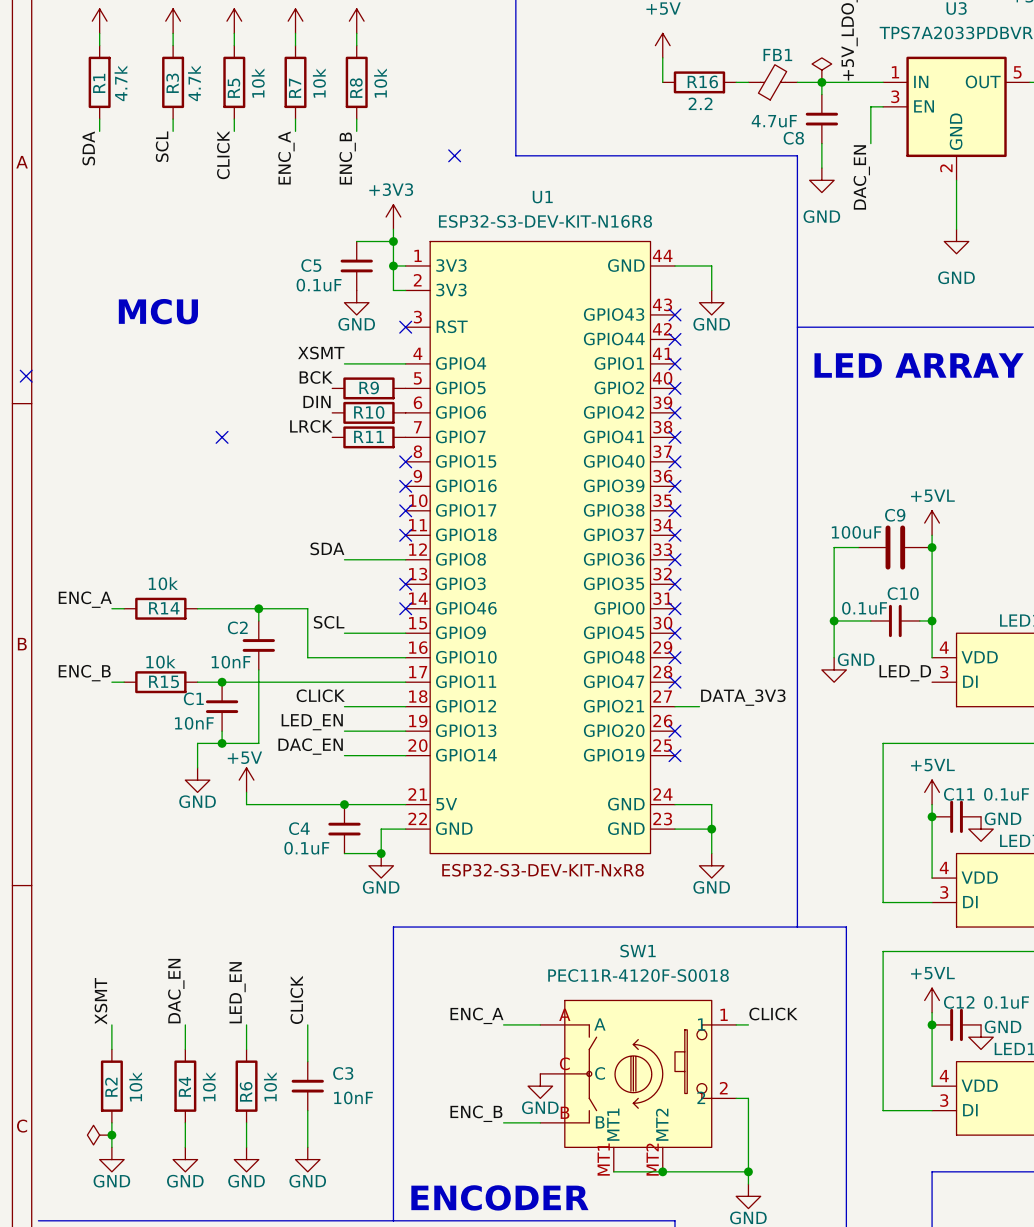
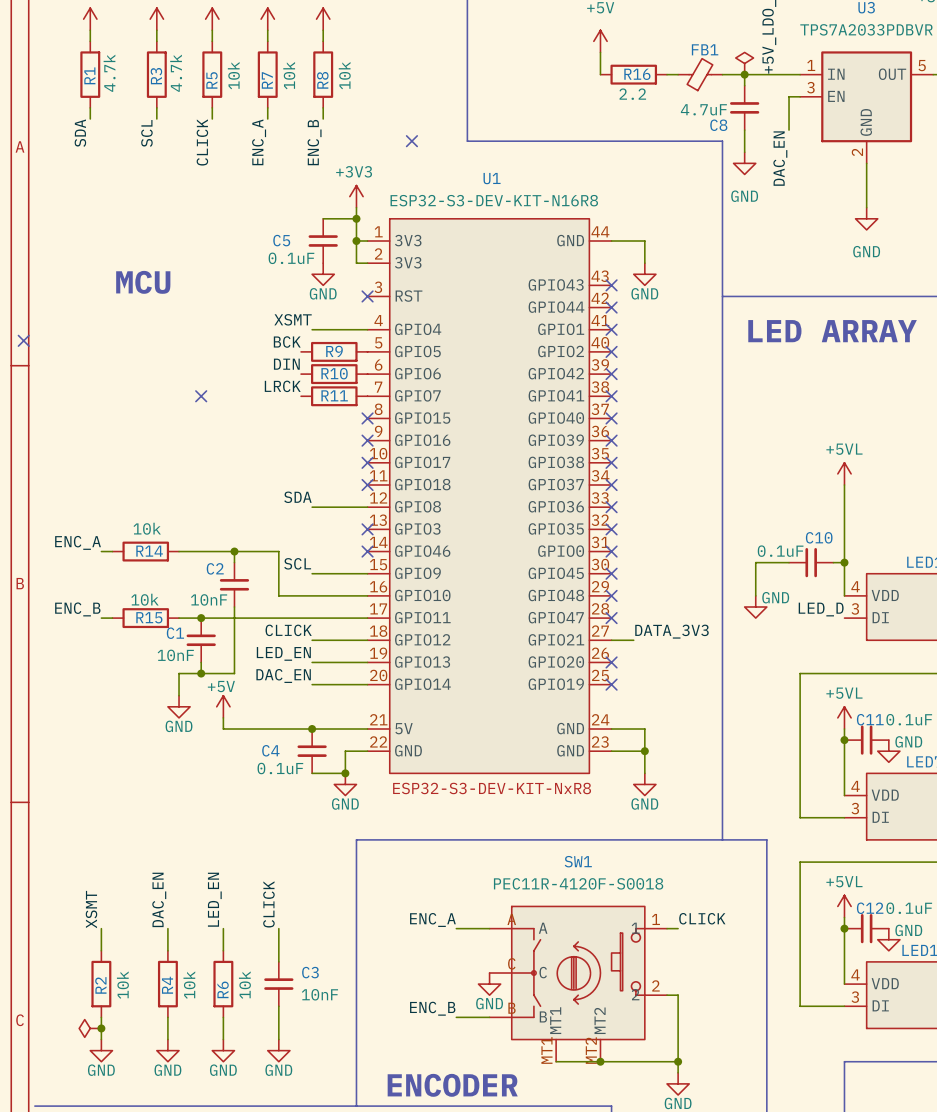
wire: (858, 547) (834, 547) (834, 620) -> none
C9: 100uF (895, 547) -> none
junction: (932, 547) -> none
junction: (834, 620) -> none

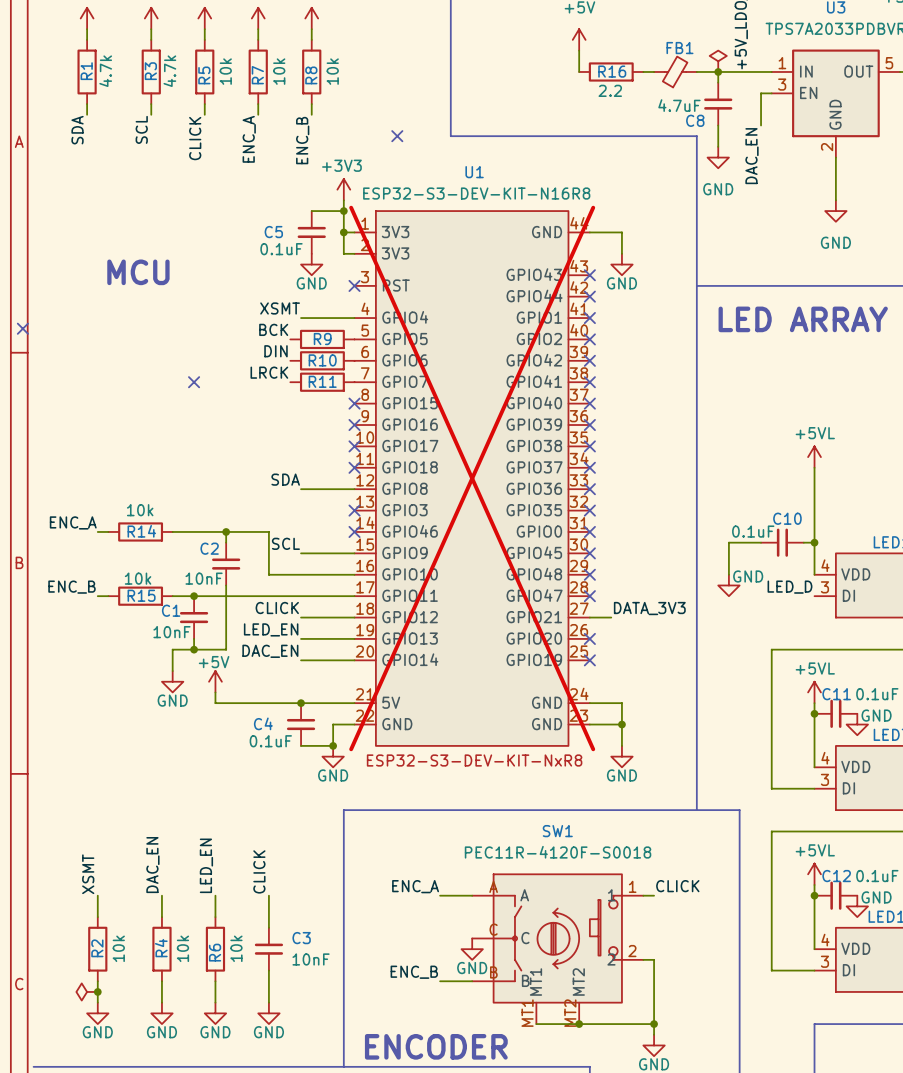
U1 do-not-place cross: none -> (472, 478)

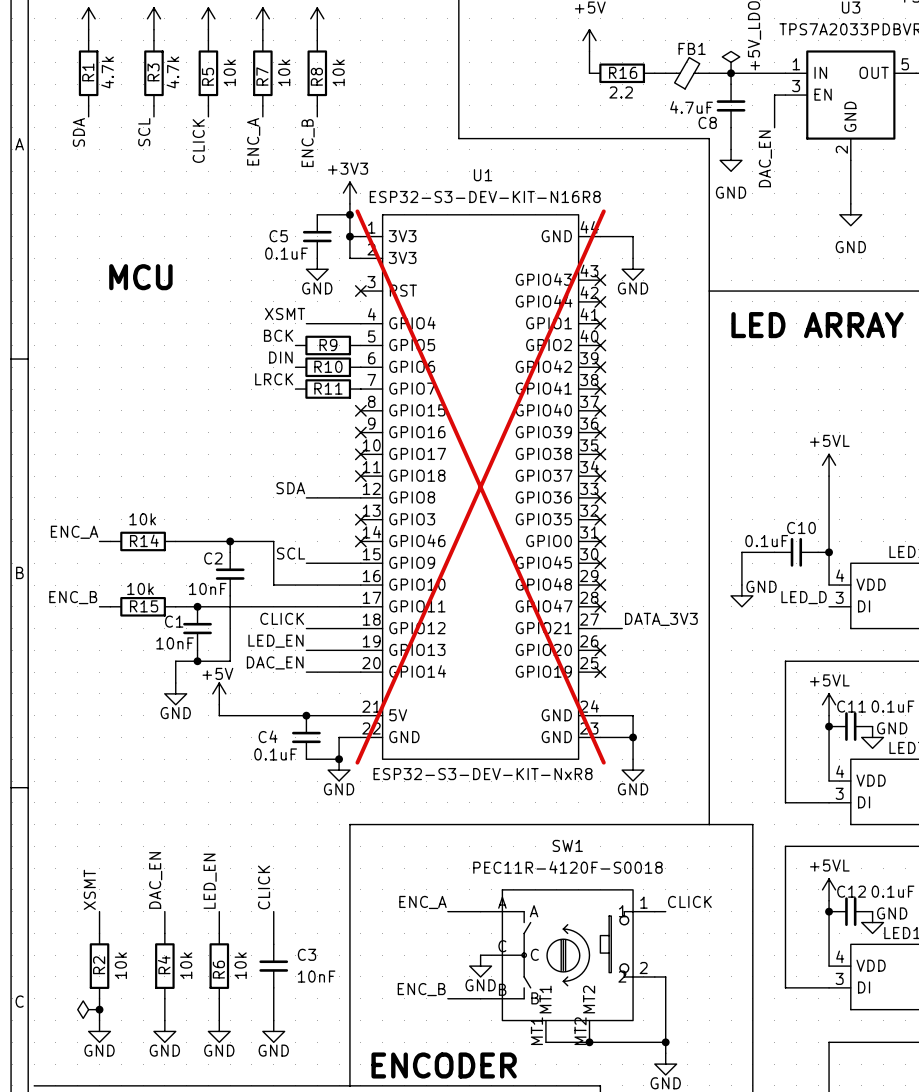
no-connect mark: (397, 136) -> none
no-connect mark: (22, 328) -> none
no-connect mark: (194, 382) -> none

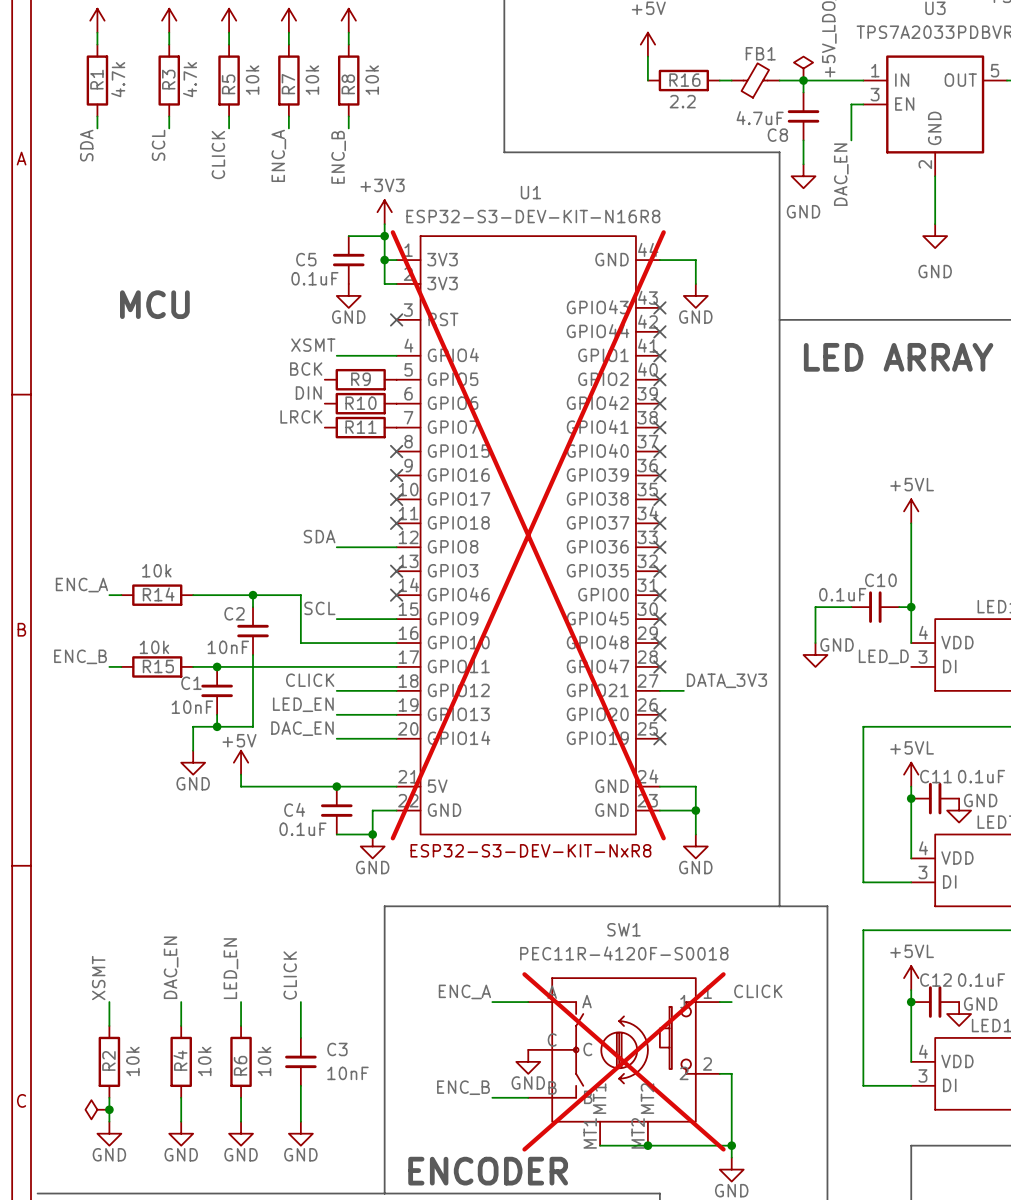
SW1 do-not-place cross: none -> (624, 1061)

